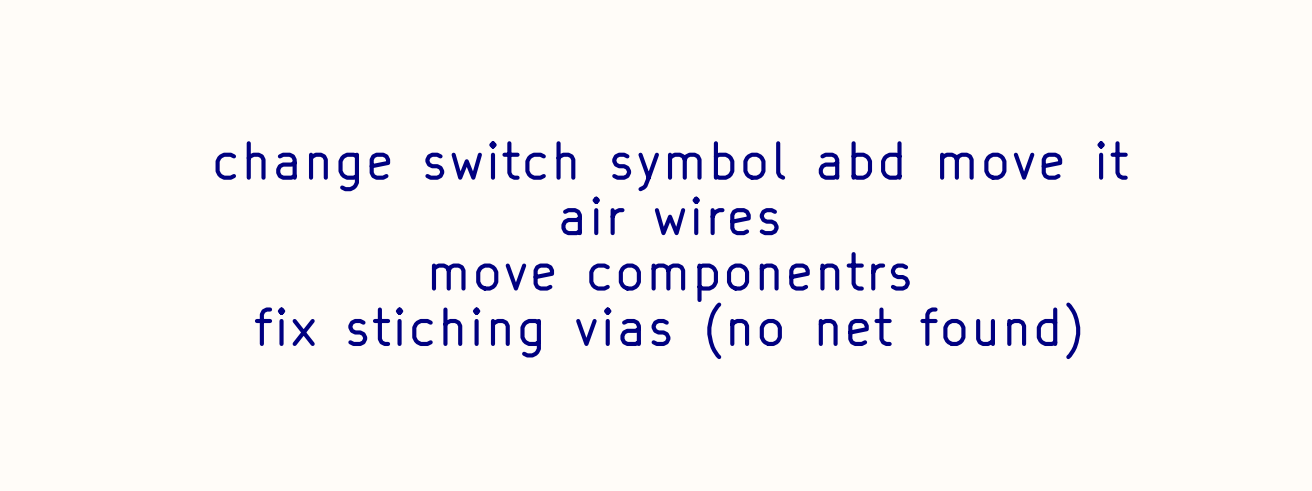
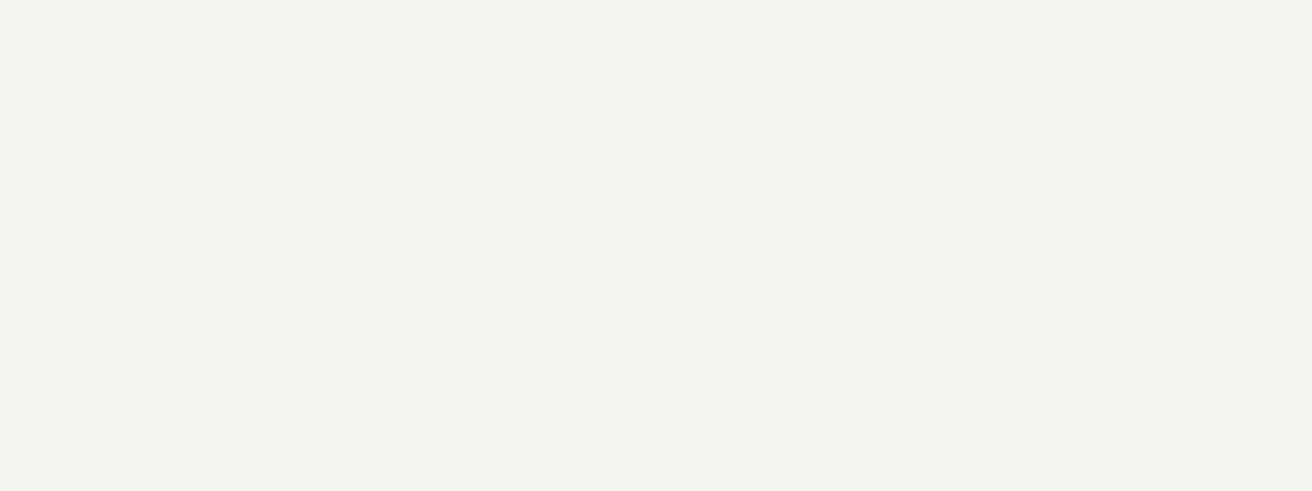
text: change switch symbol abd move it (671, 166) -> none
text: air wires (670, 215) -> none
text: move componentrs (670, 277) -> none
text: fix stiching vias (no net found) (667, 330) -> none

